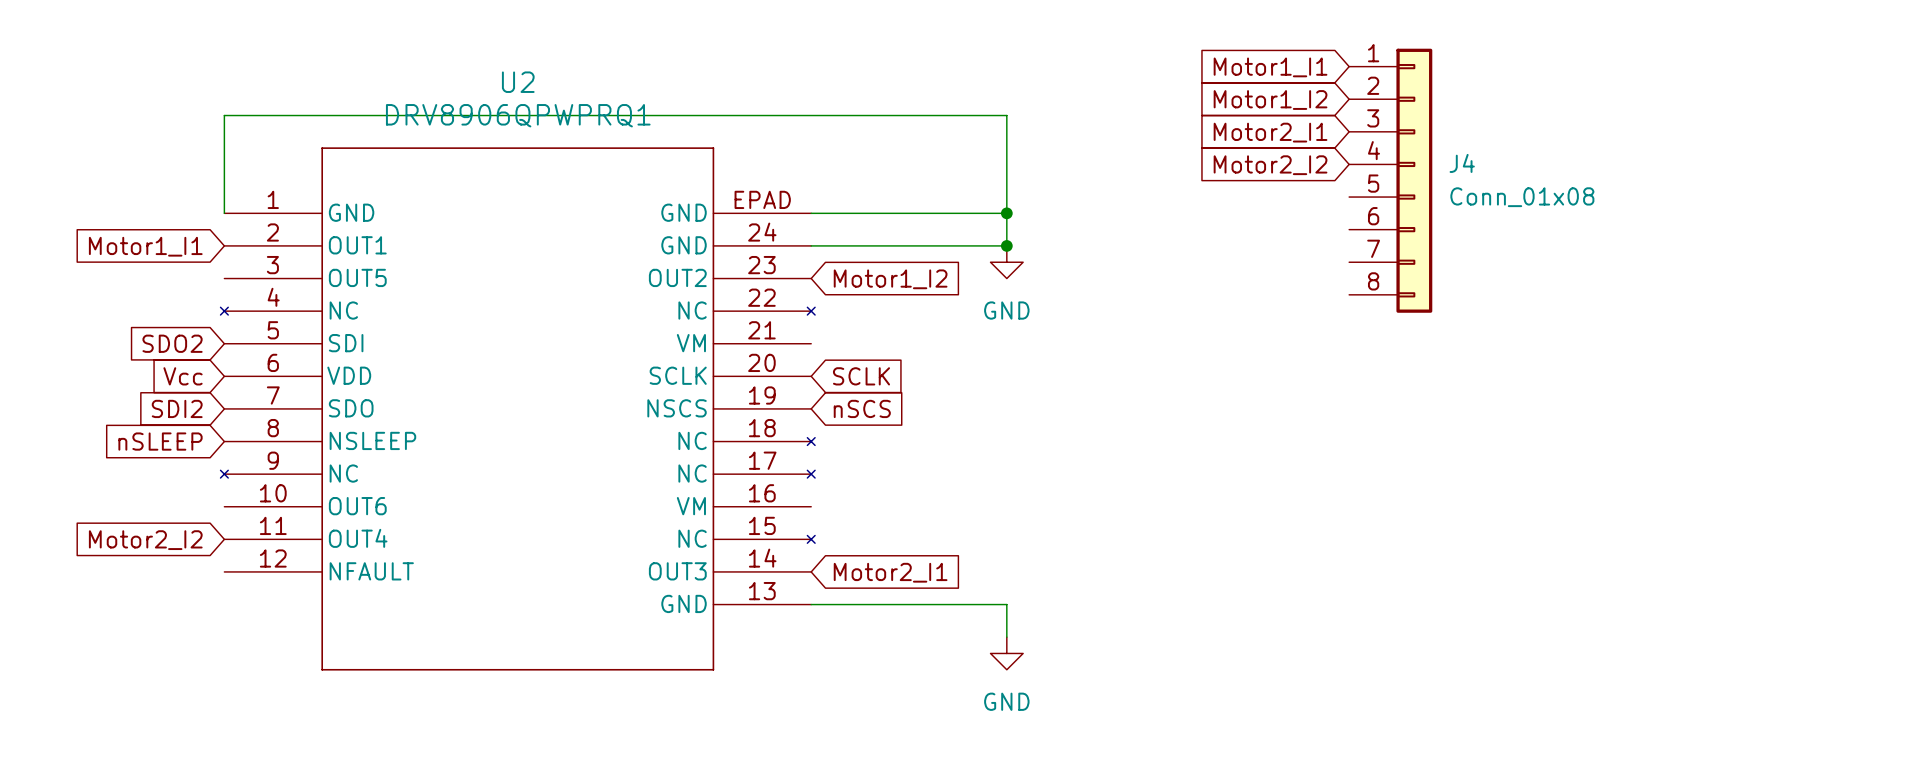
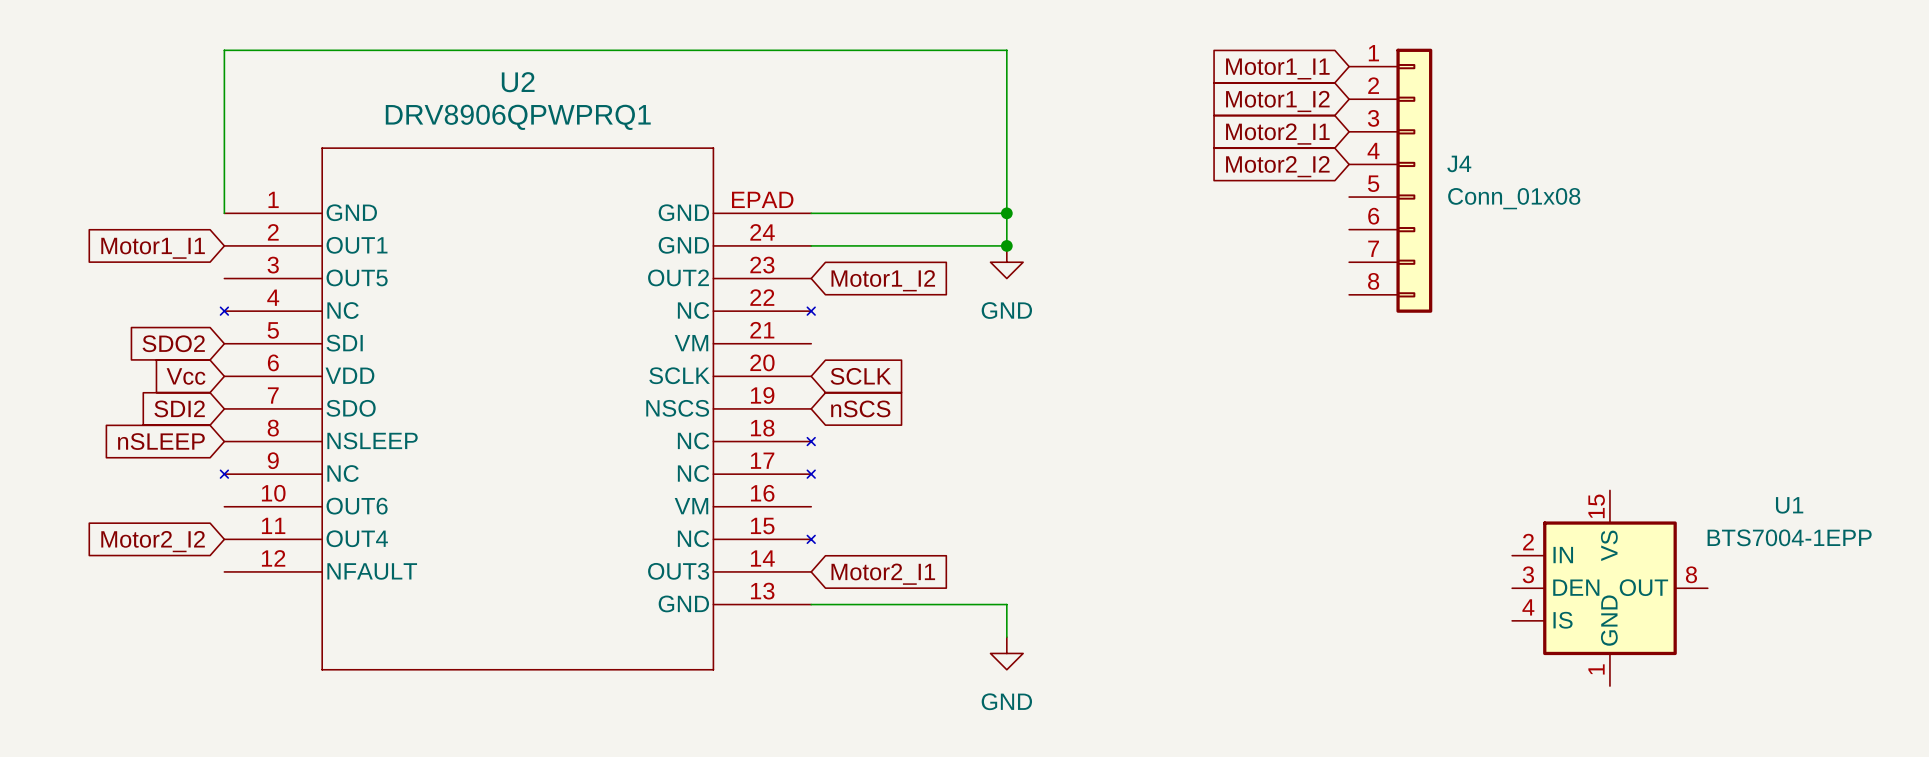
wire: (224, 115) (1006, 115) -> (224, 115) (224, 50) (1006, 50) (1006, 115)
U1: none -> BTS7004-1EPP (1609, 588)

